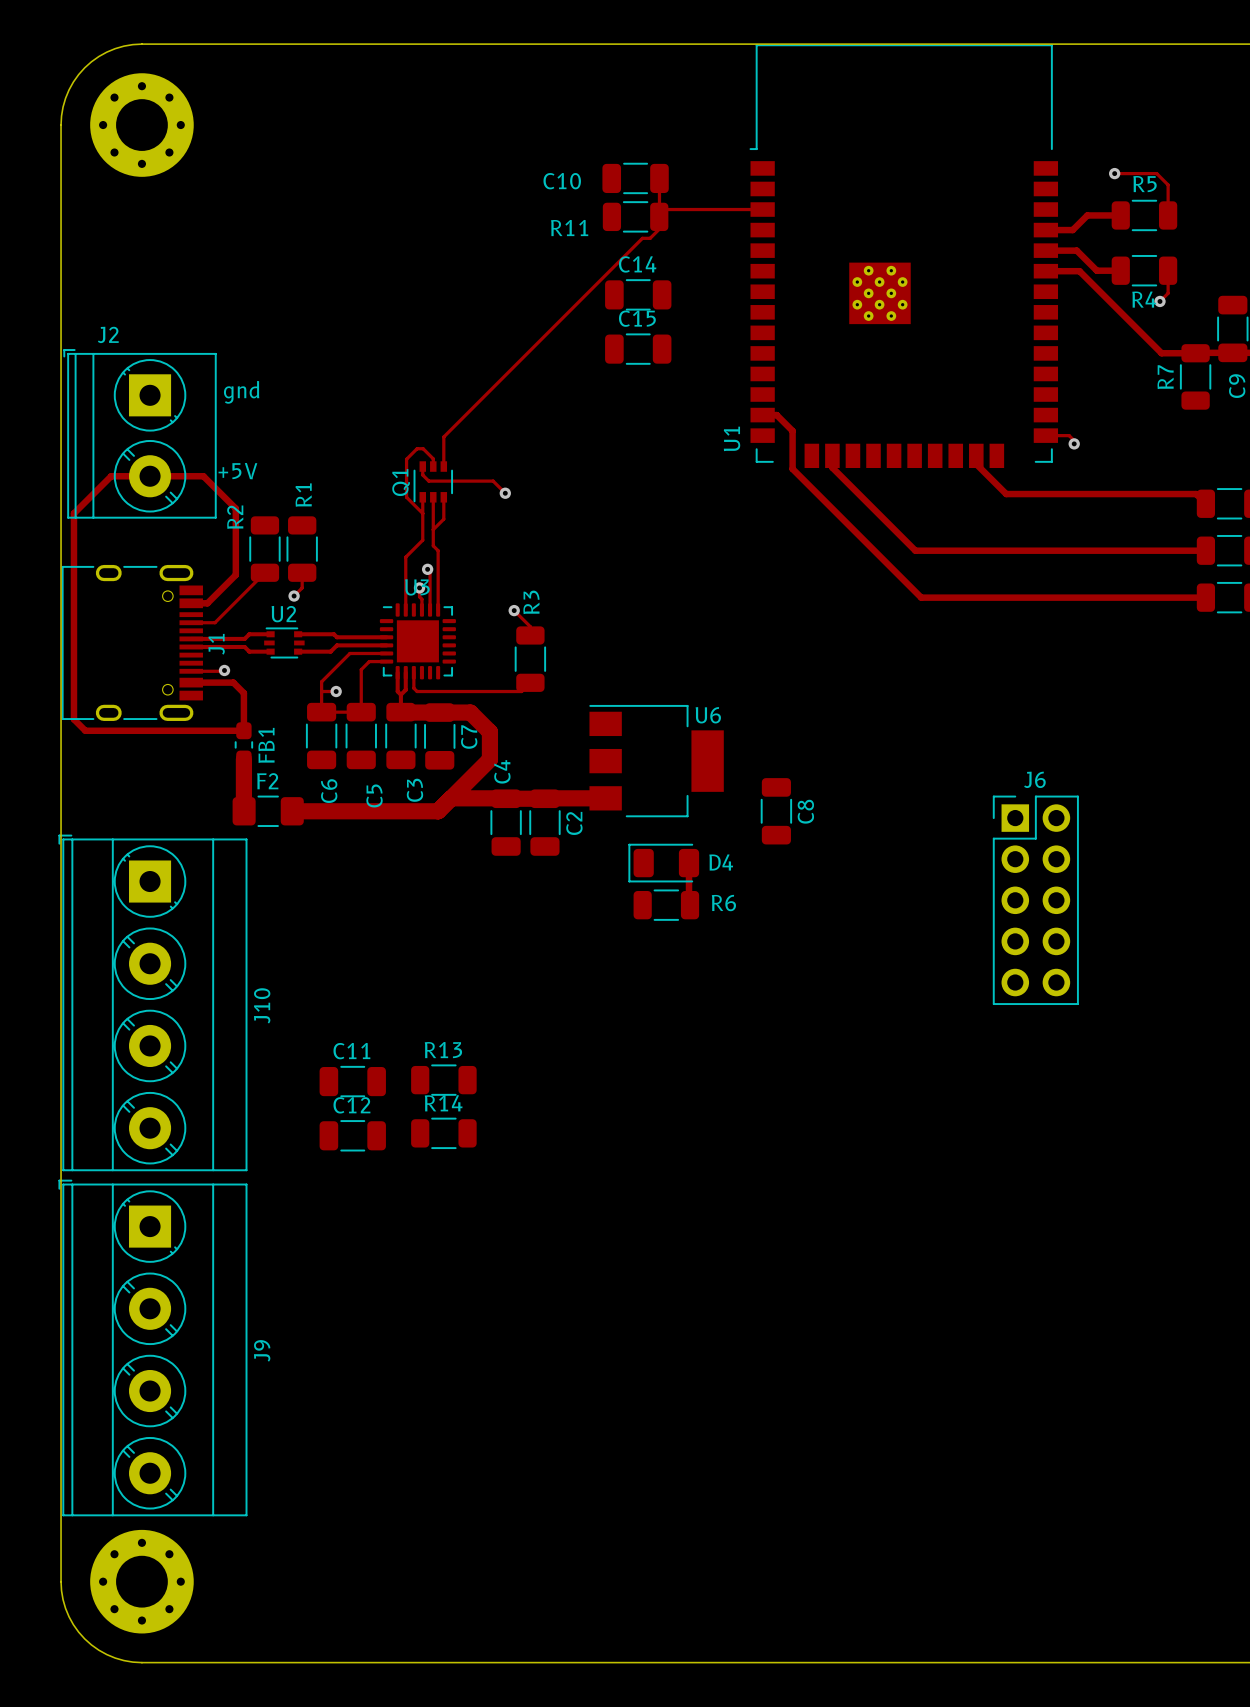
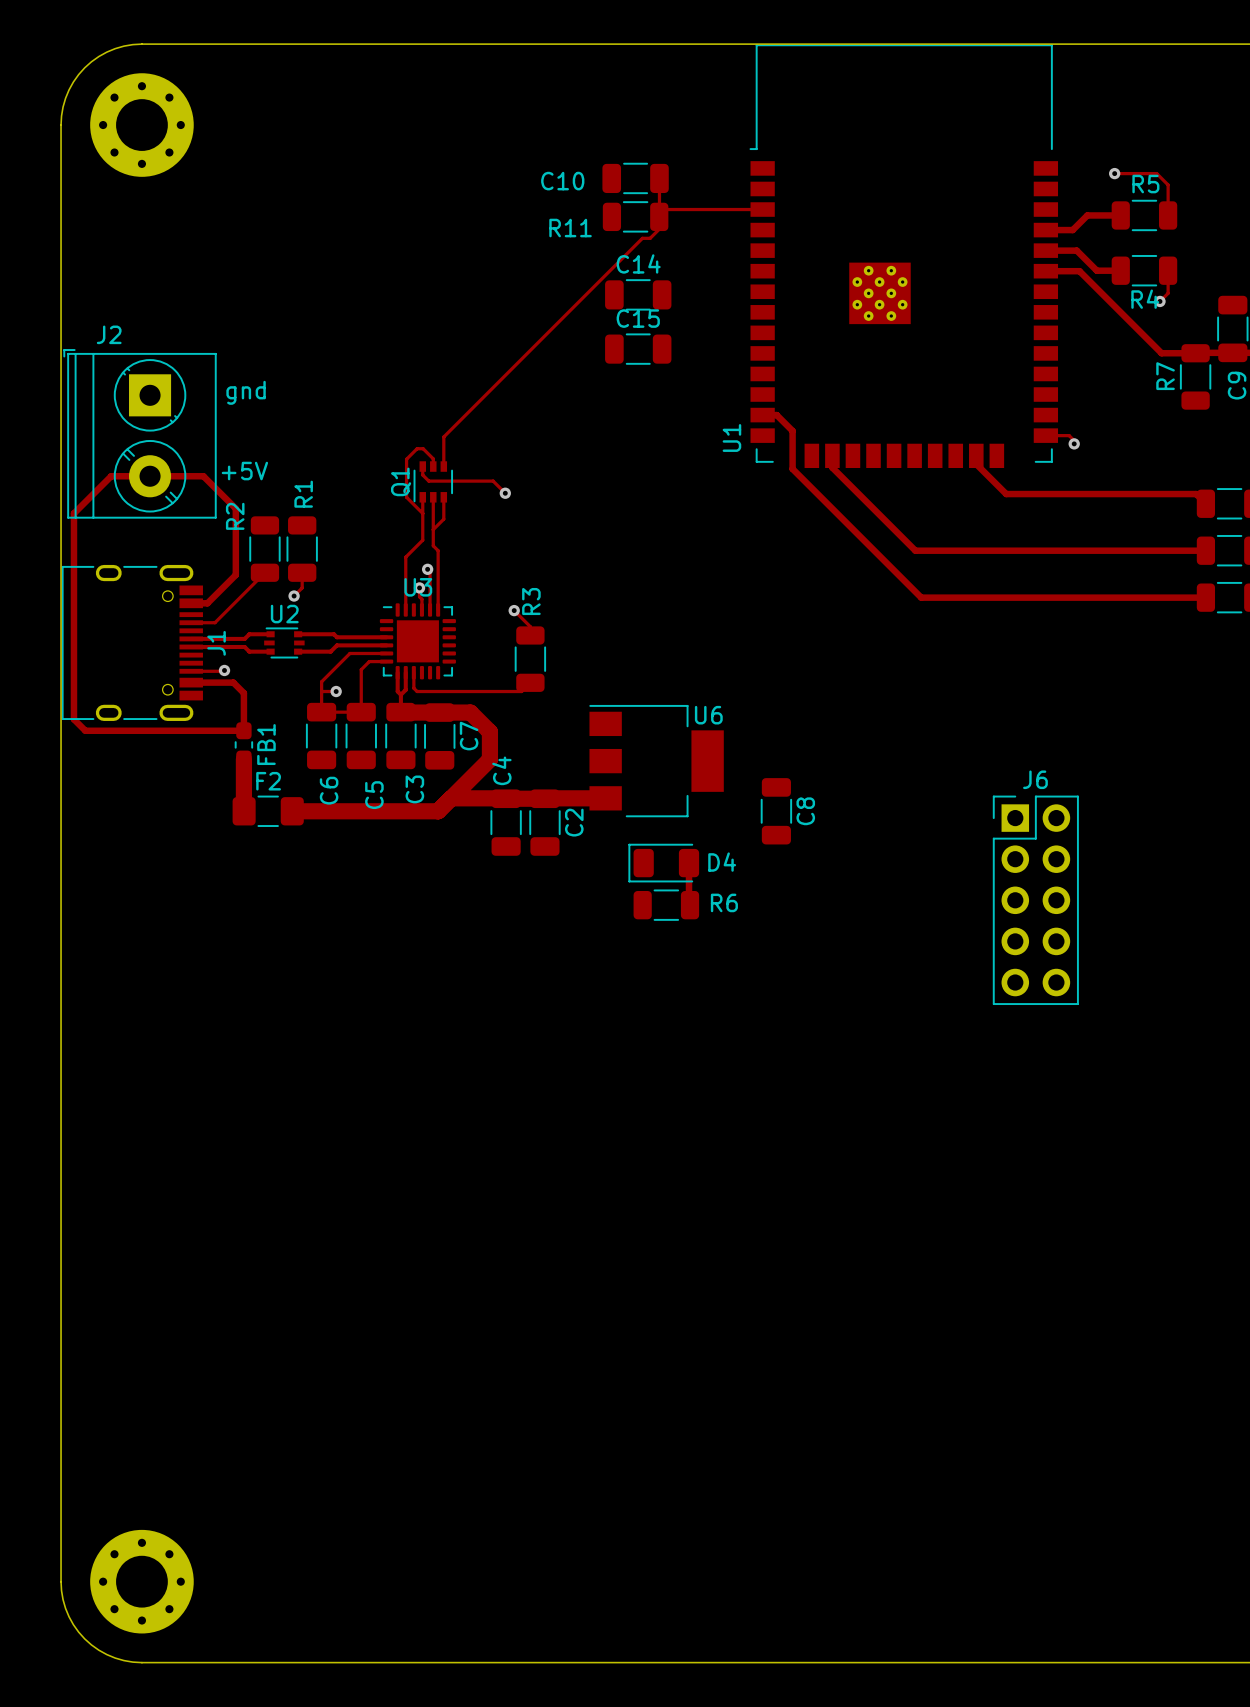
J10: (152, 1002) -> none
R13: (443, 1080) -> none
C11: (352, 1081) -> none
R14: (443, 1133) -> none
C12: (352, 1135) -> none
J9: (152, 1347) -> none

